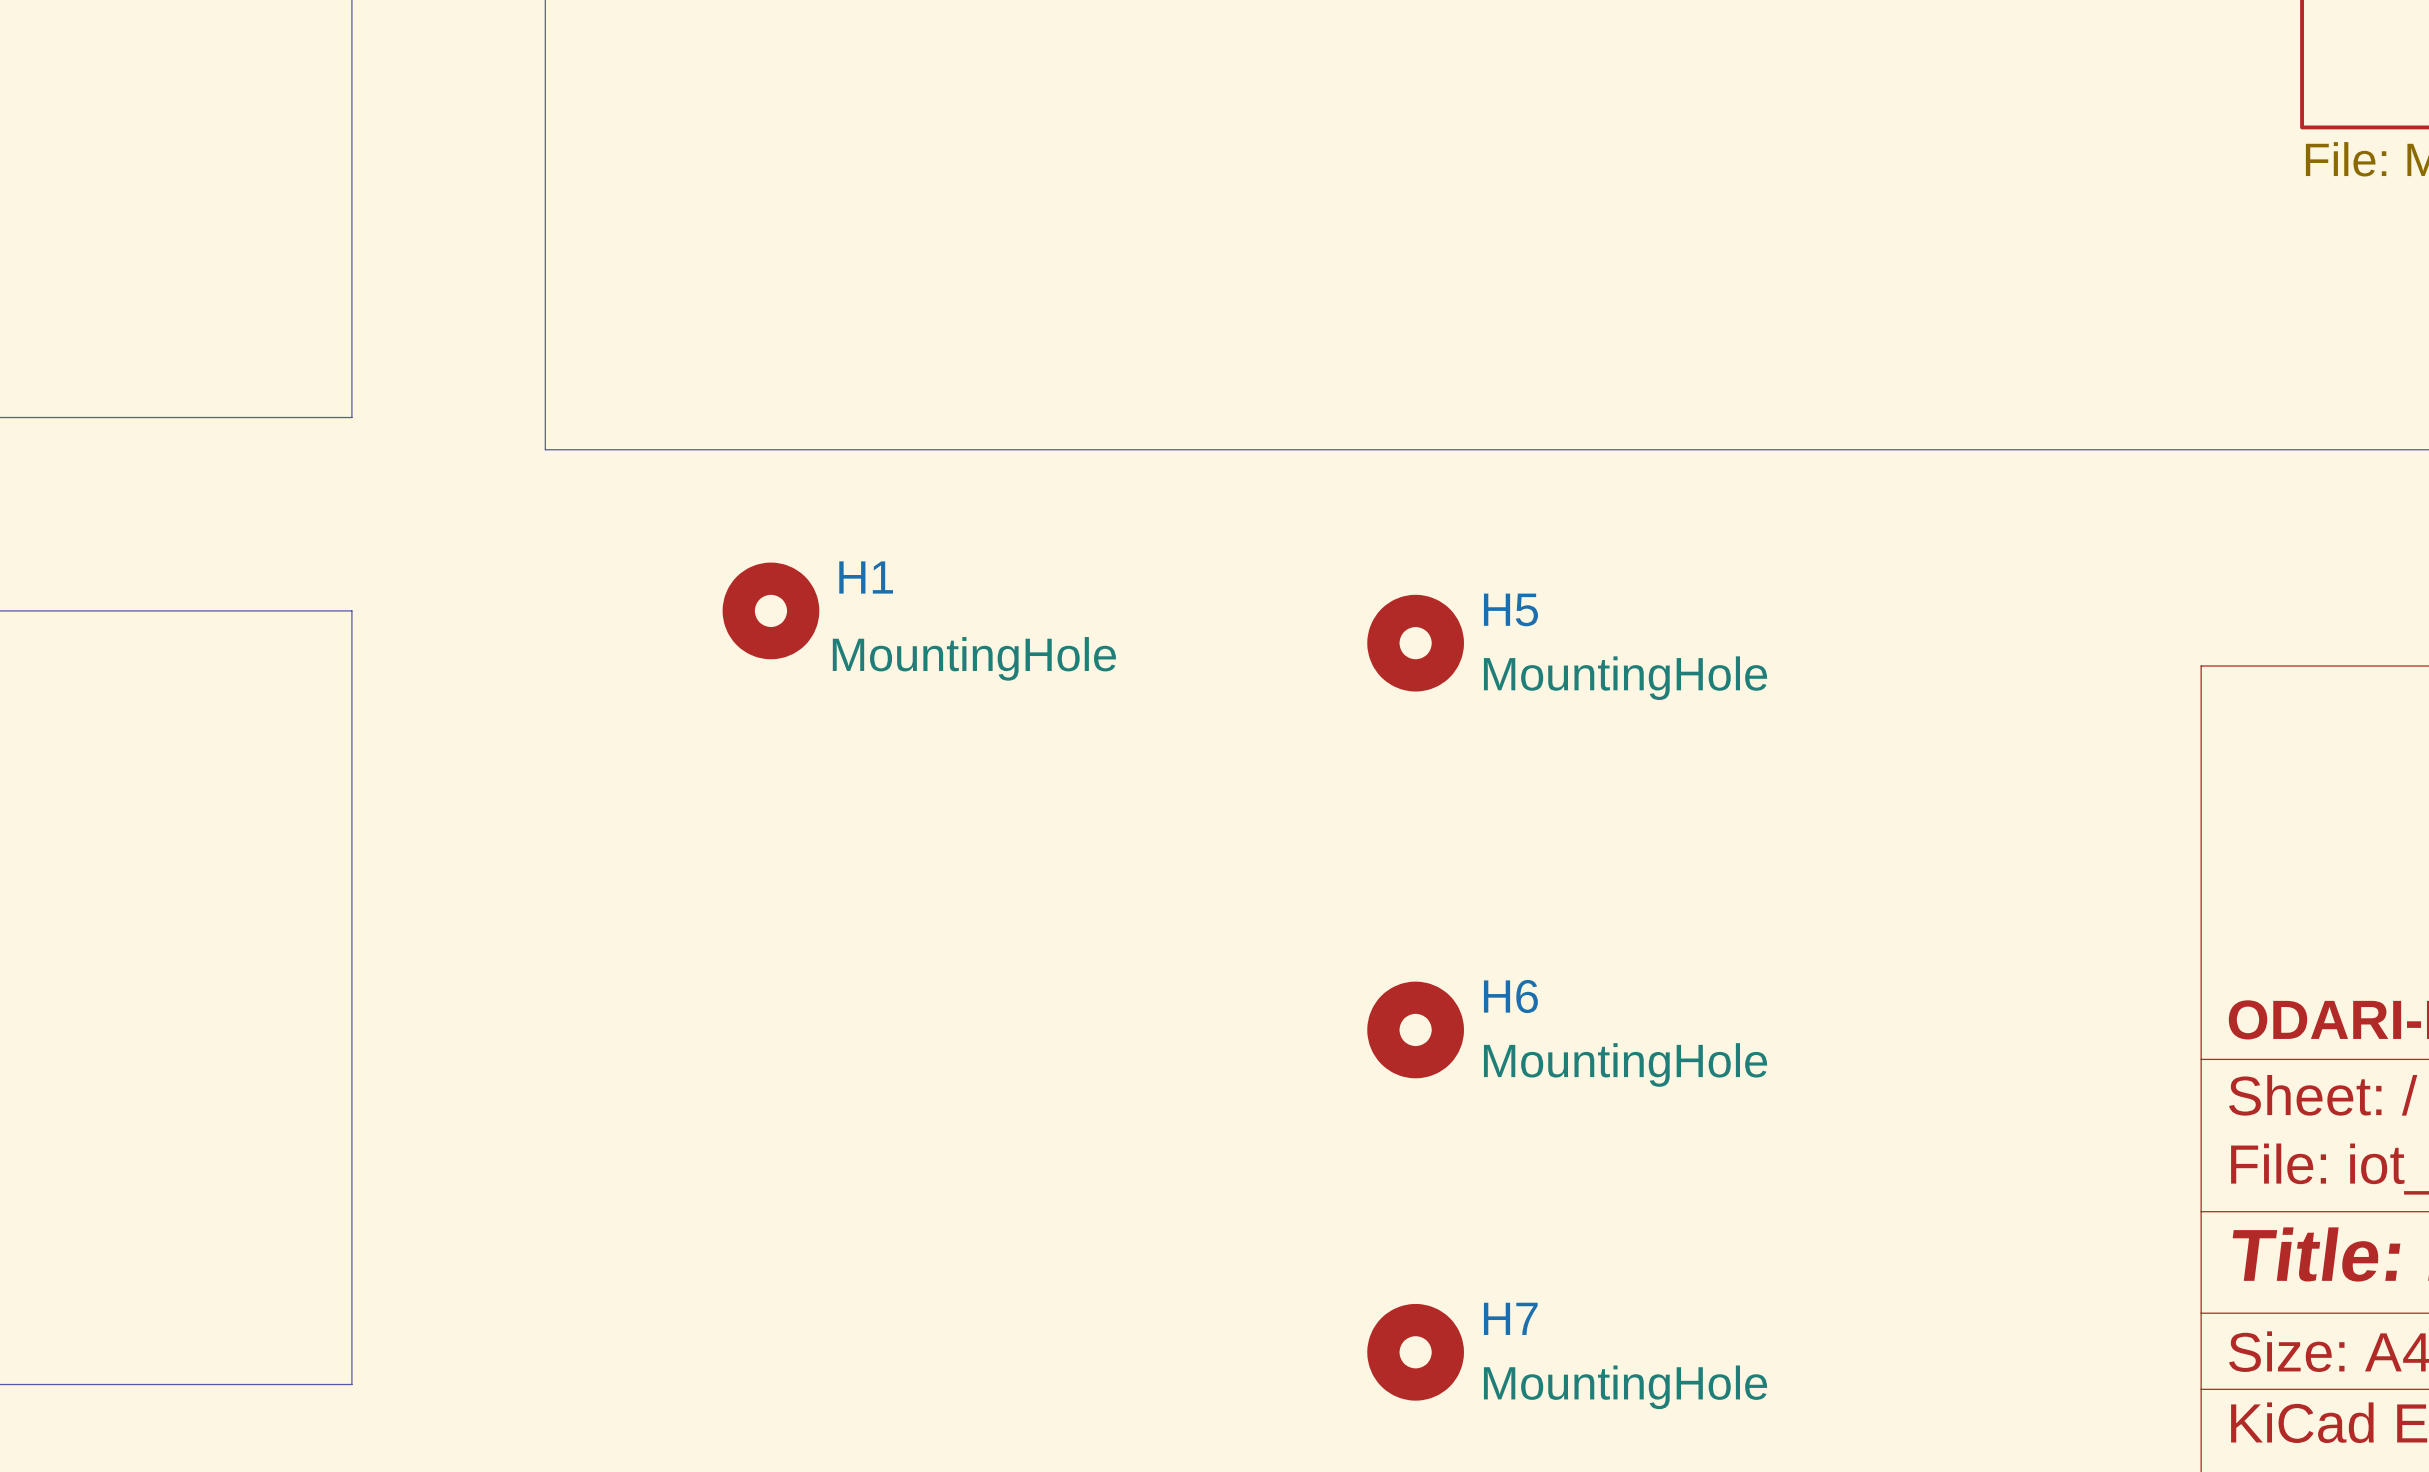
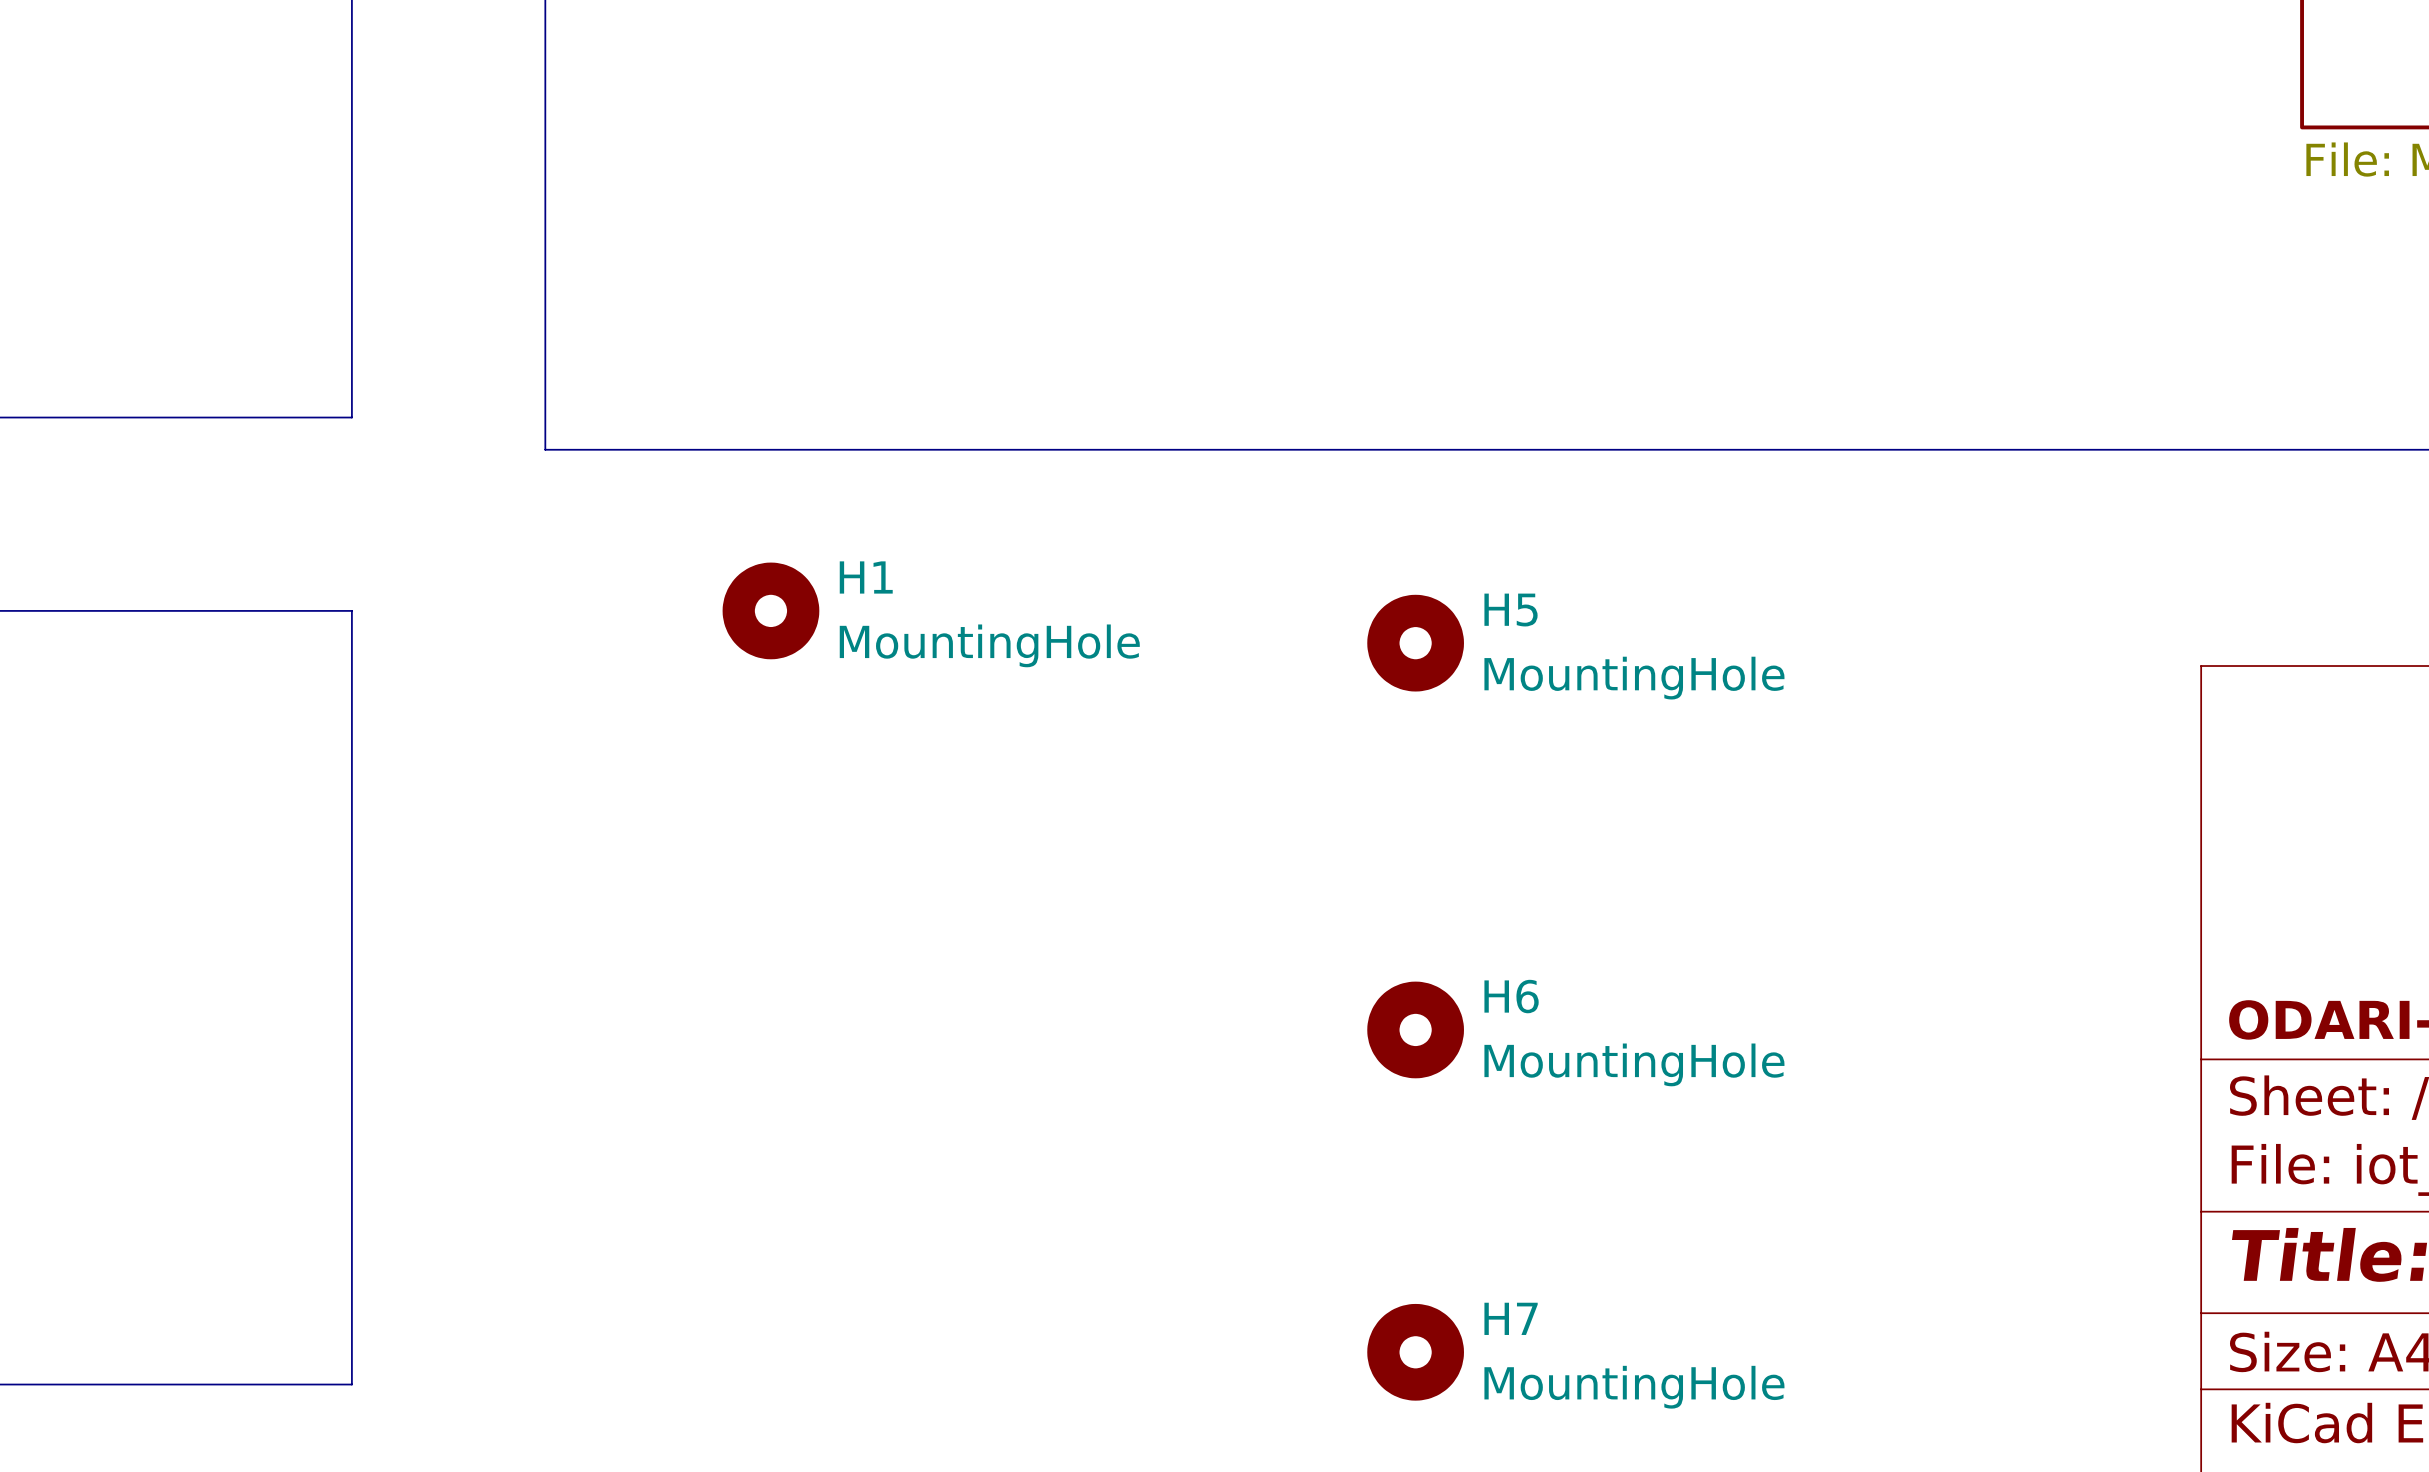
H1 value position: MountingHole (974, 658) -> MountingHole (989, 645)

